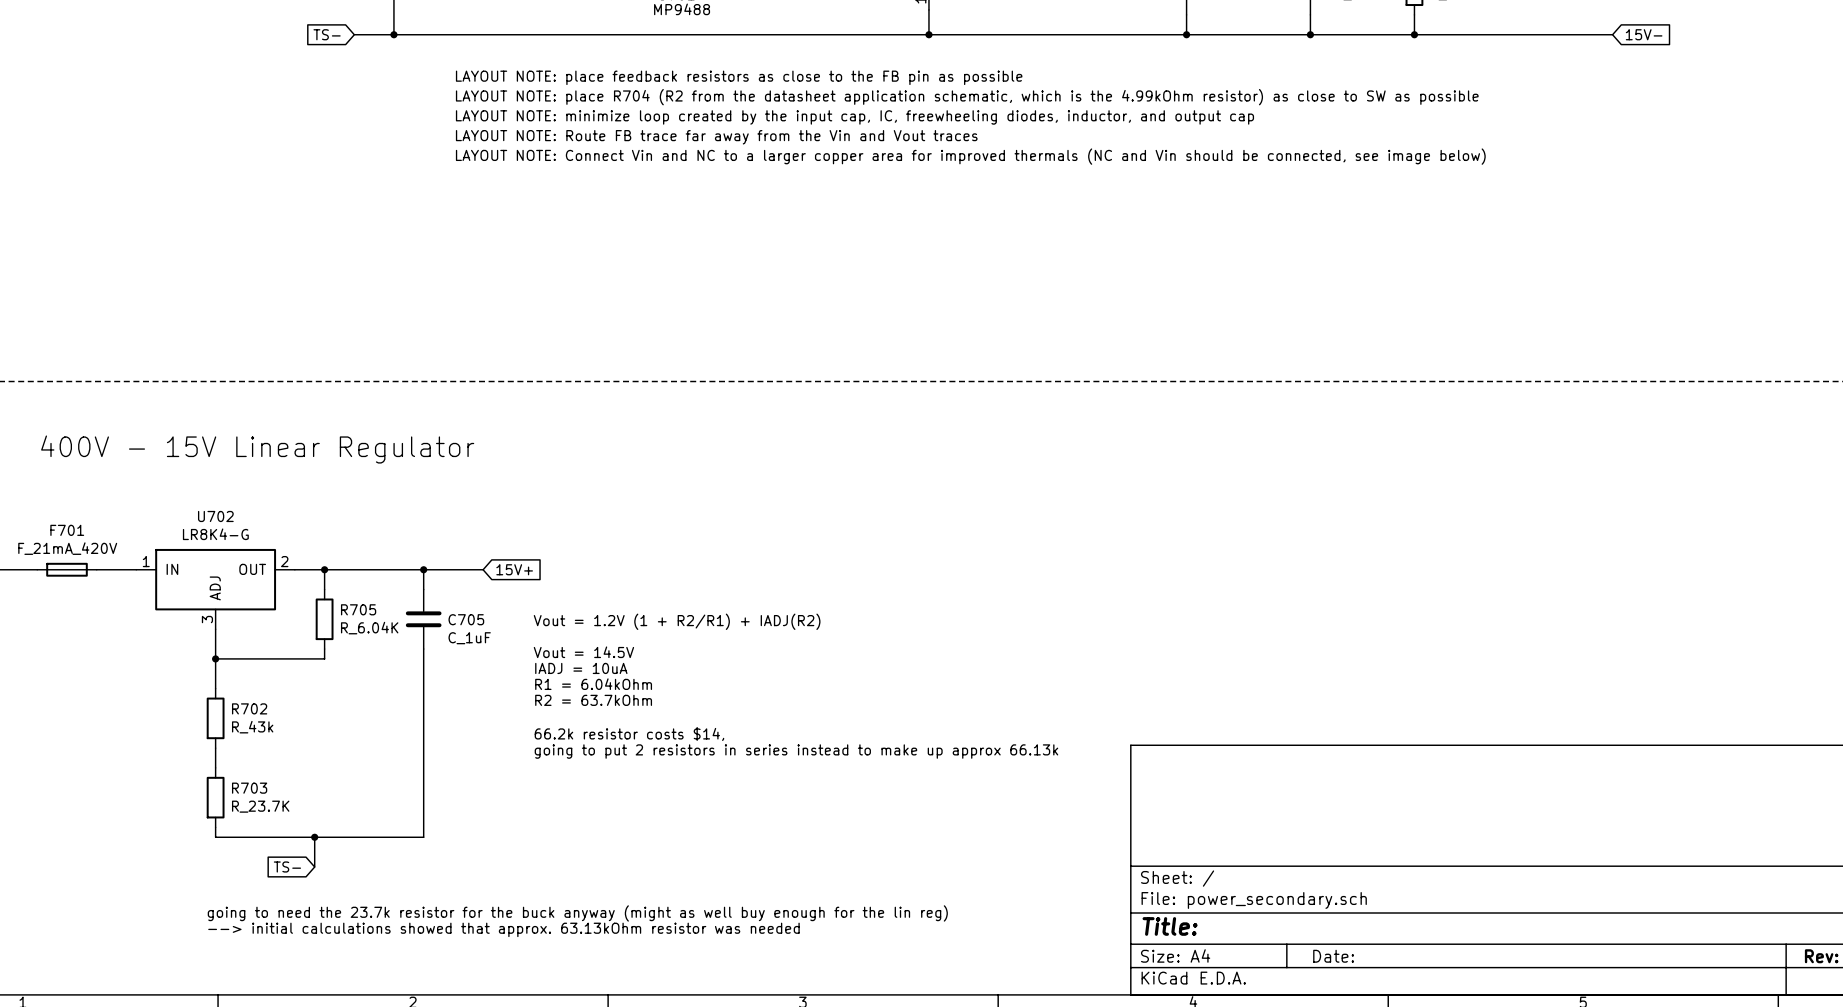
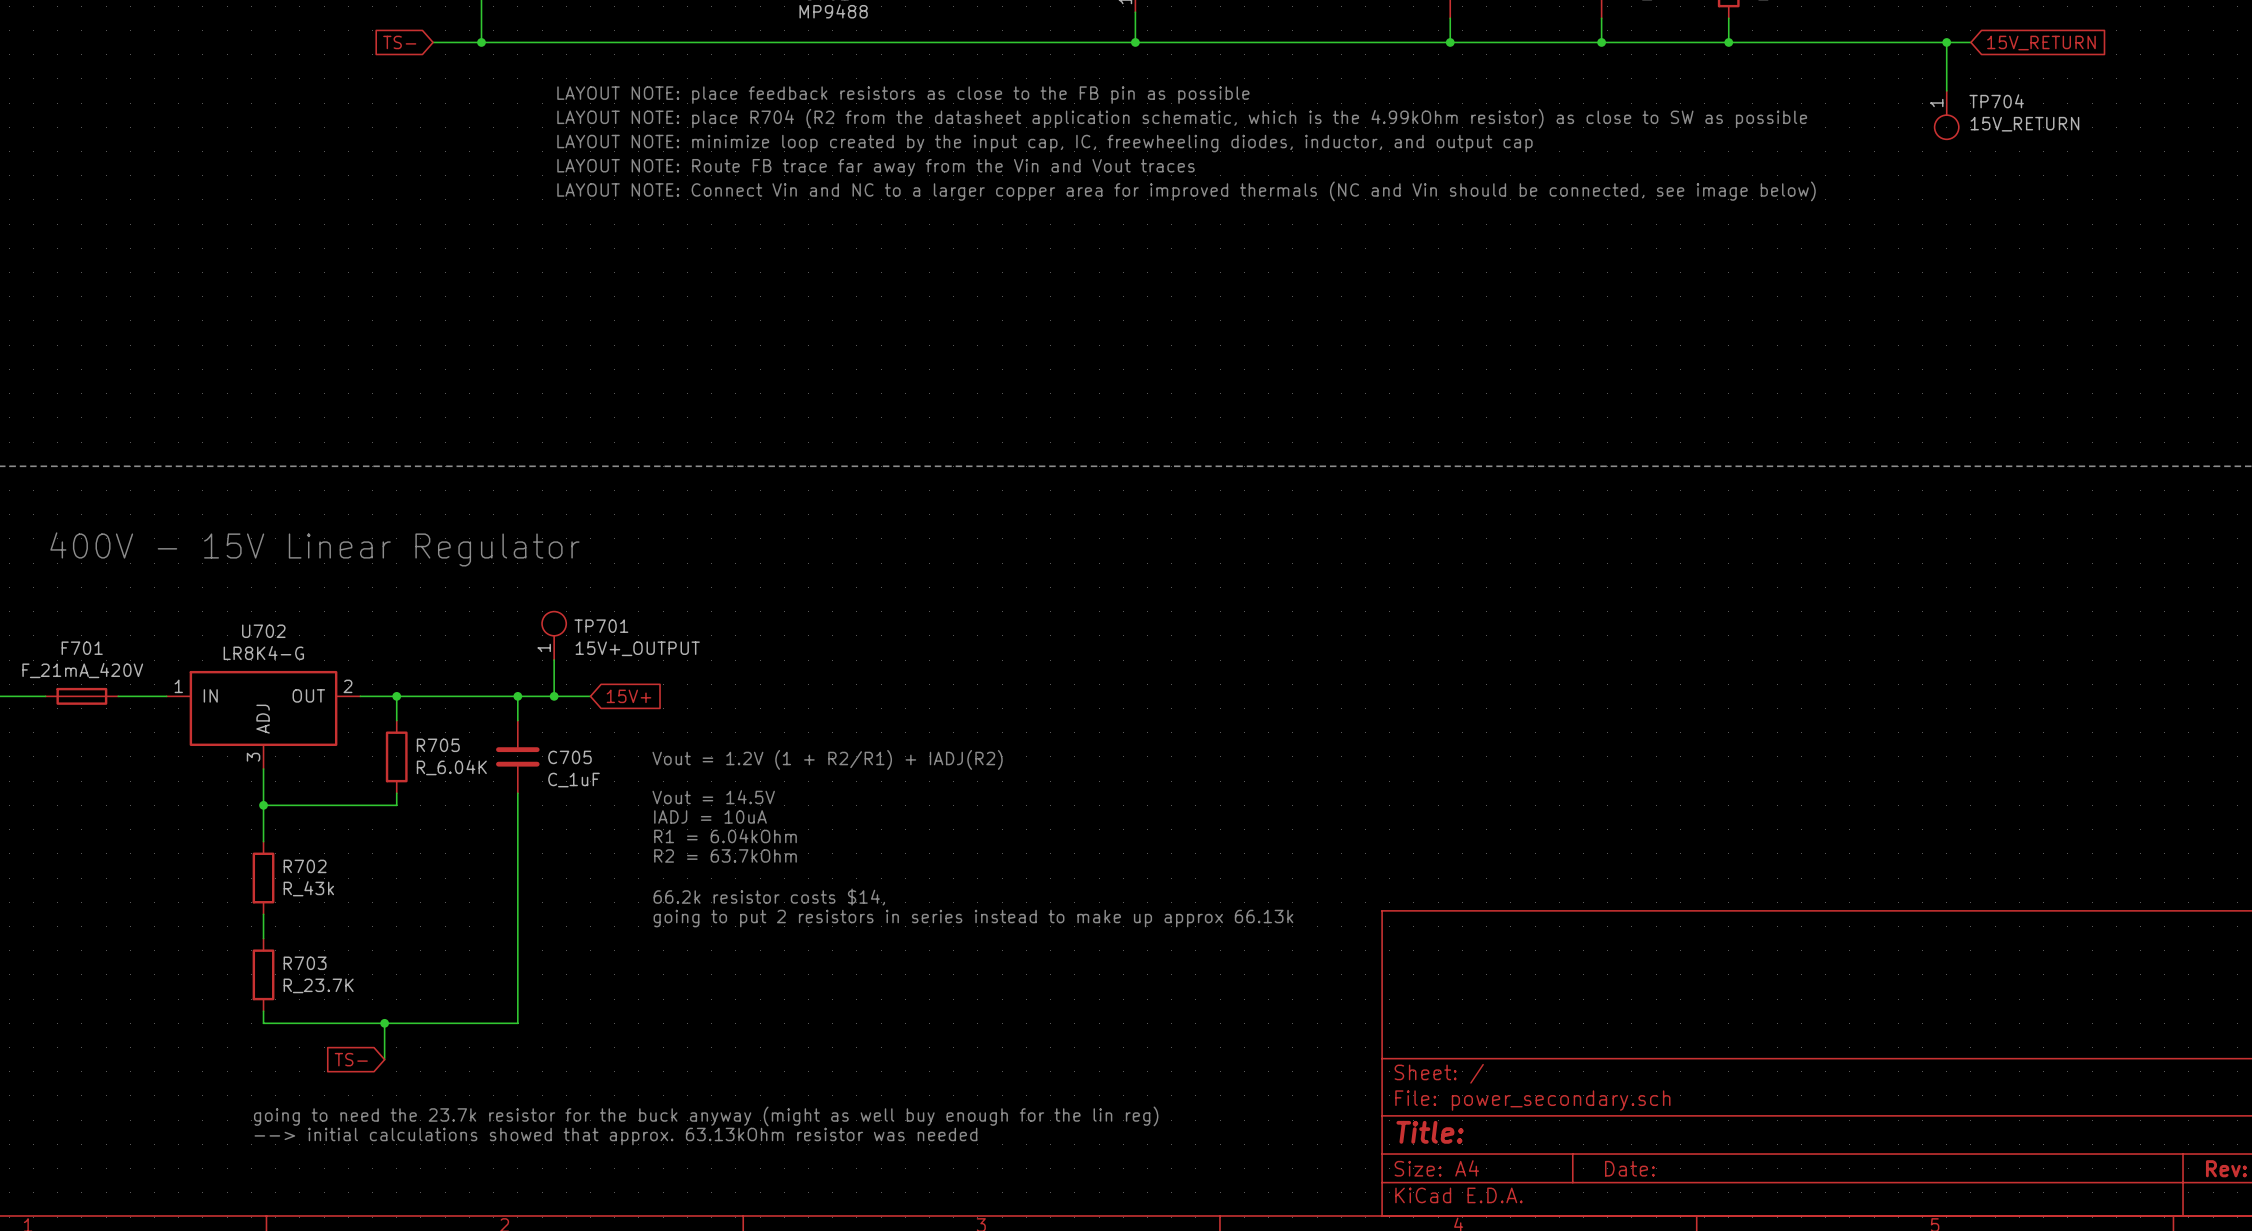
wire: none -> (1946, 42) (1946, 90)
junction: none -> (1946, 42)
global label: 15V- (1644, 34) -> 15V_RETURN (2041, 43)
TP704: none -> 15V_RETURN (1946, 115)
TP701: none -> 15V+_OUTPUT (554, 635)
wire: none -> (554, 660) (554, 696)
junction: none -> (554, 696)

